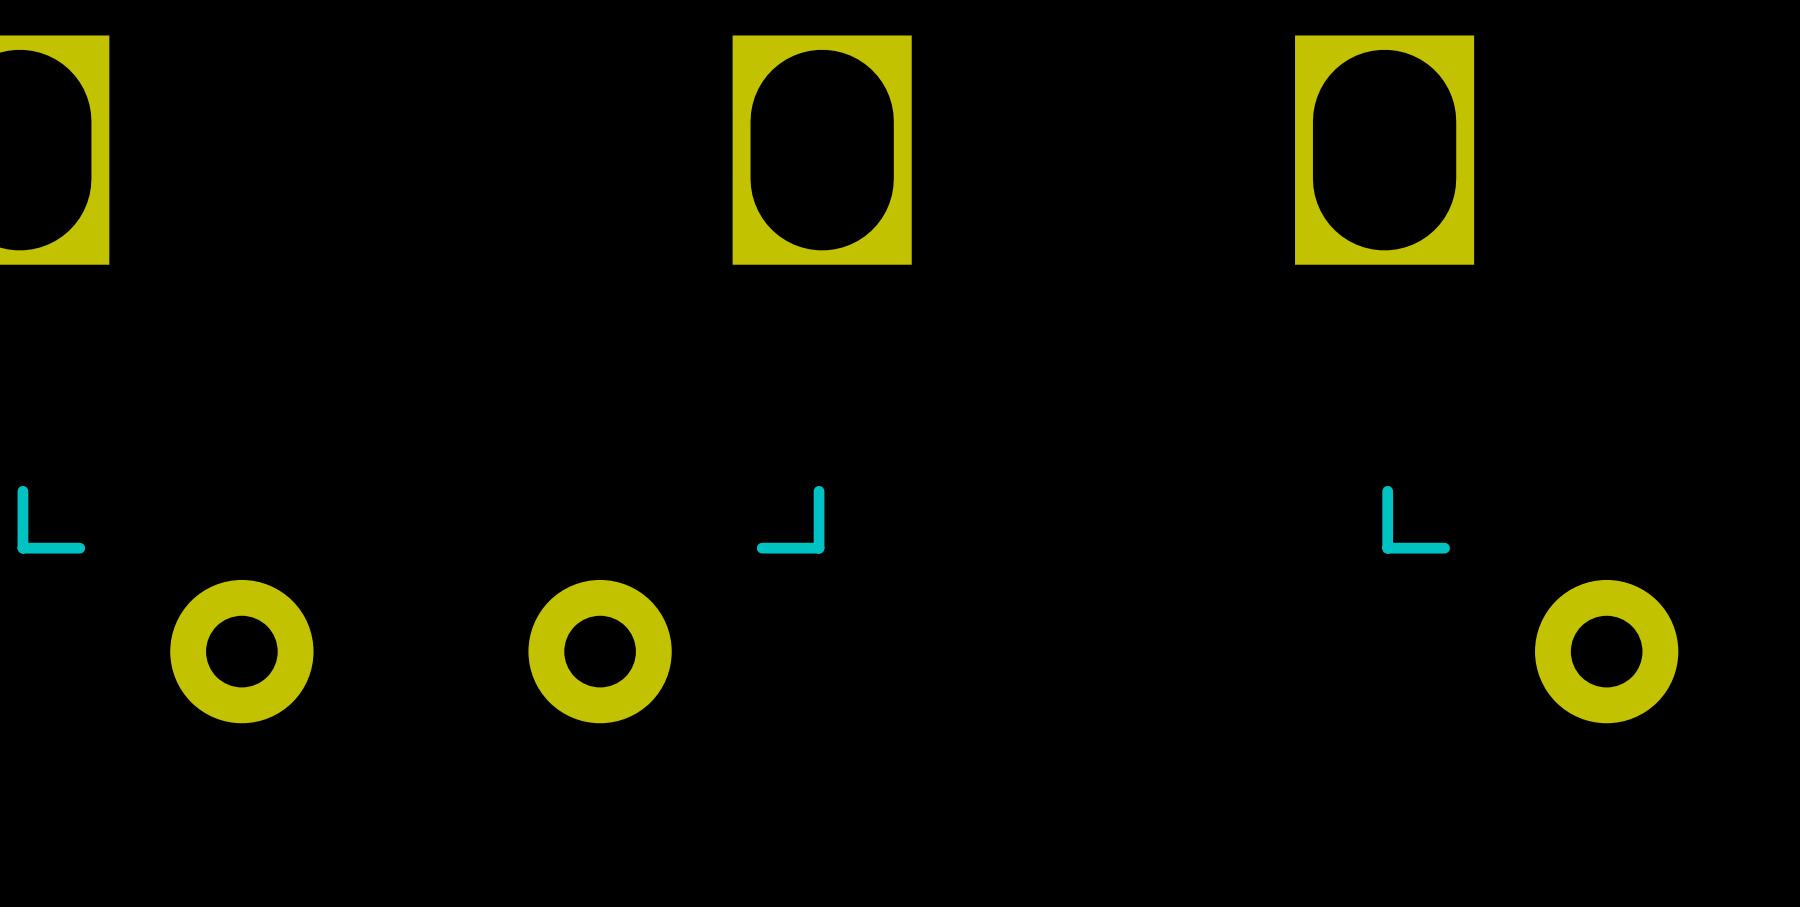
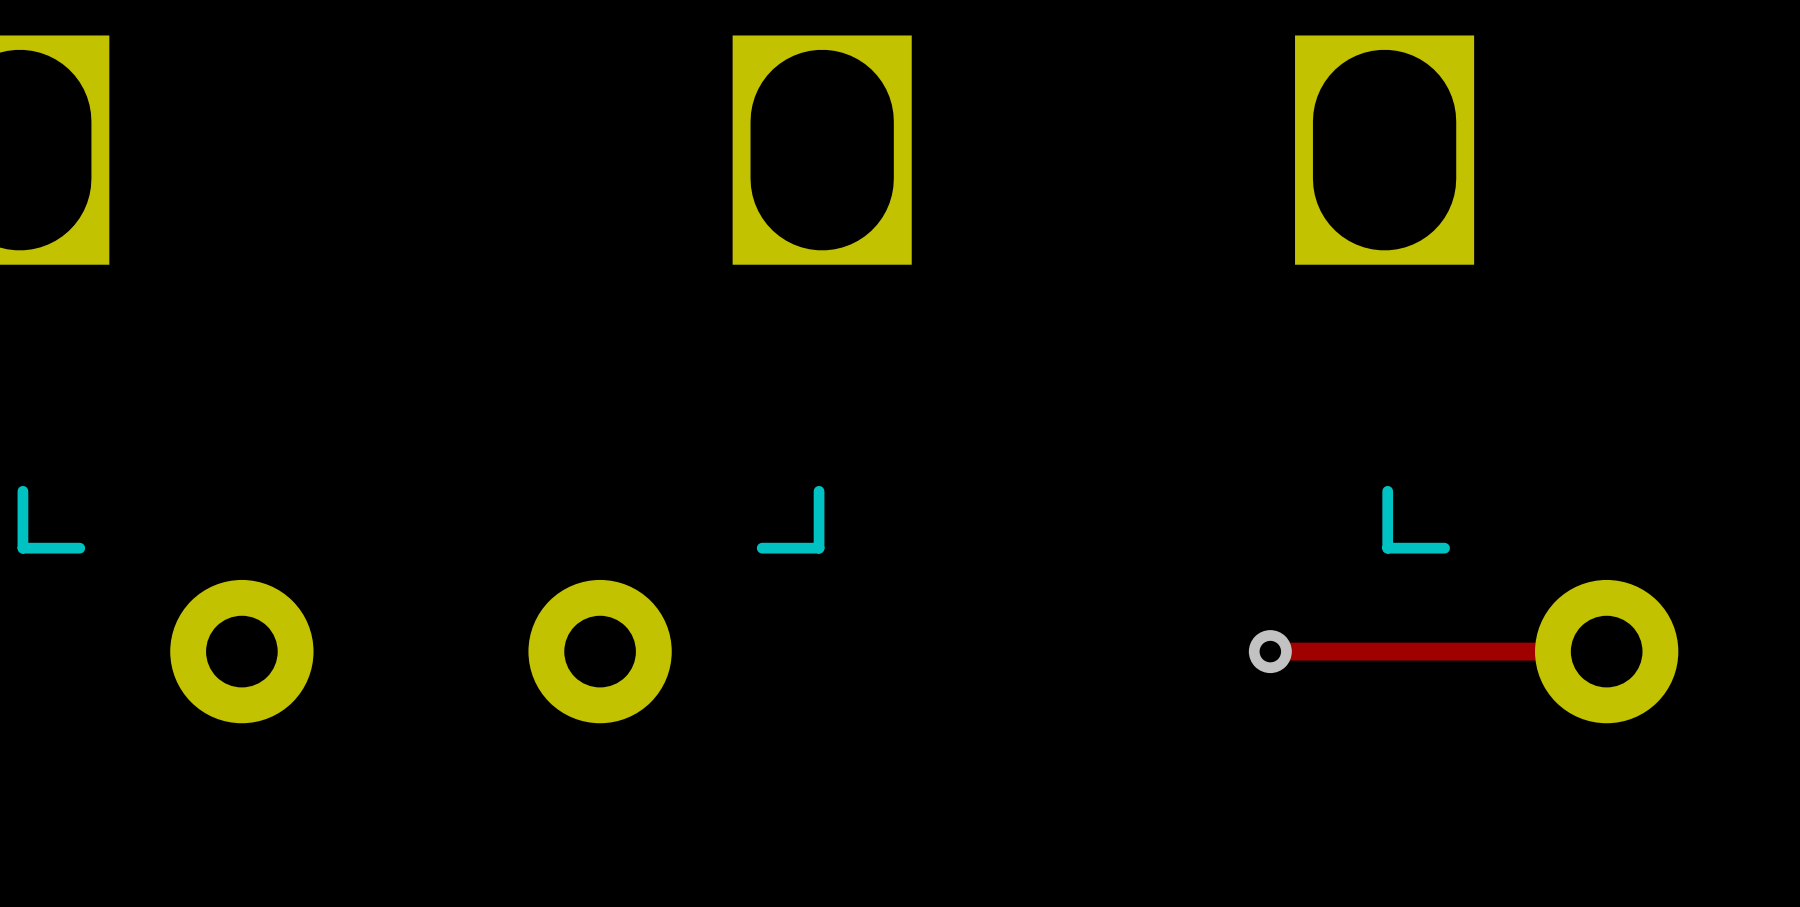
track: none -> (1270, 651) (1606, 651)
via: none -> (1270, 651)

